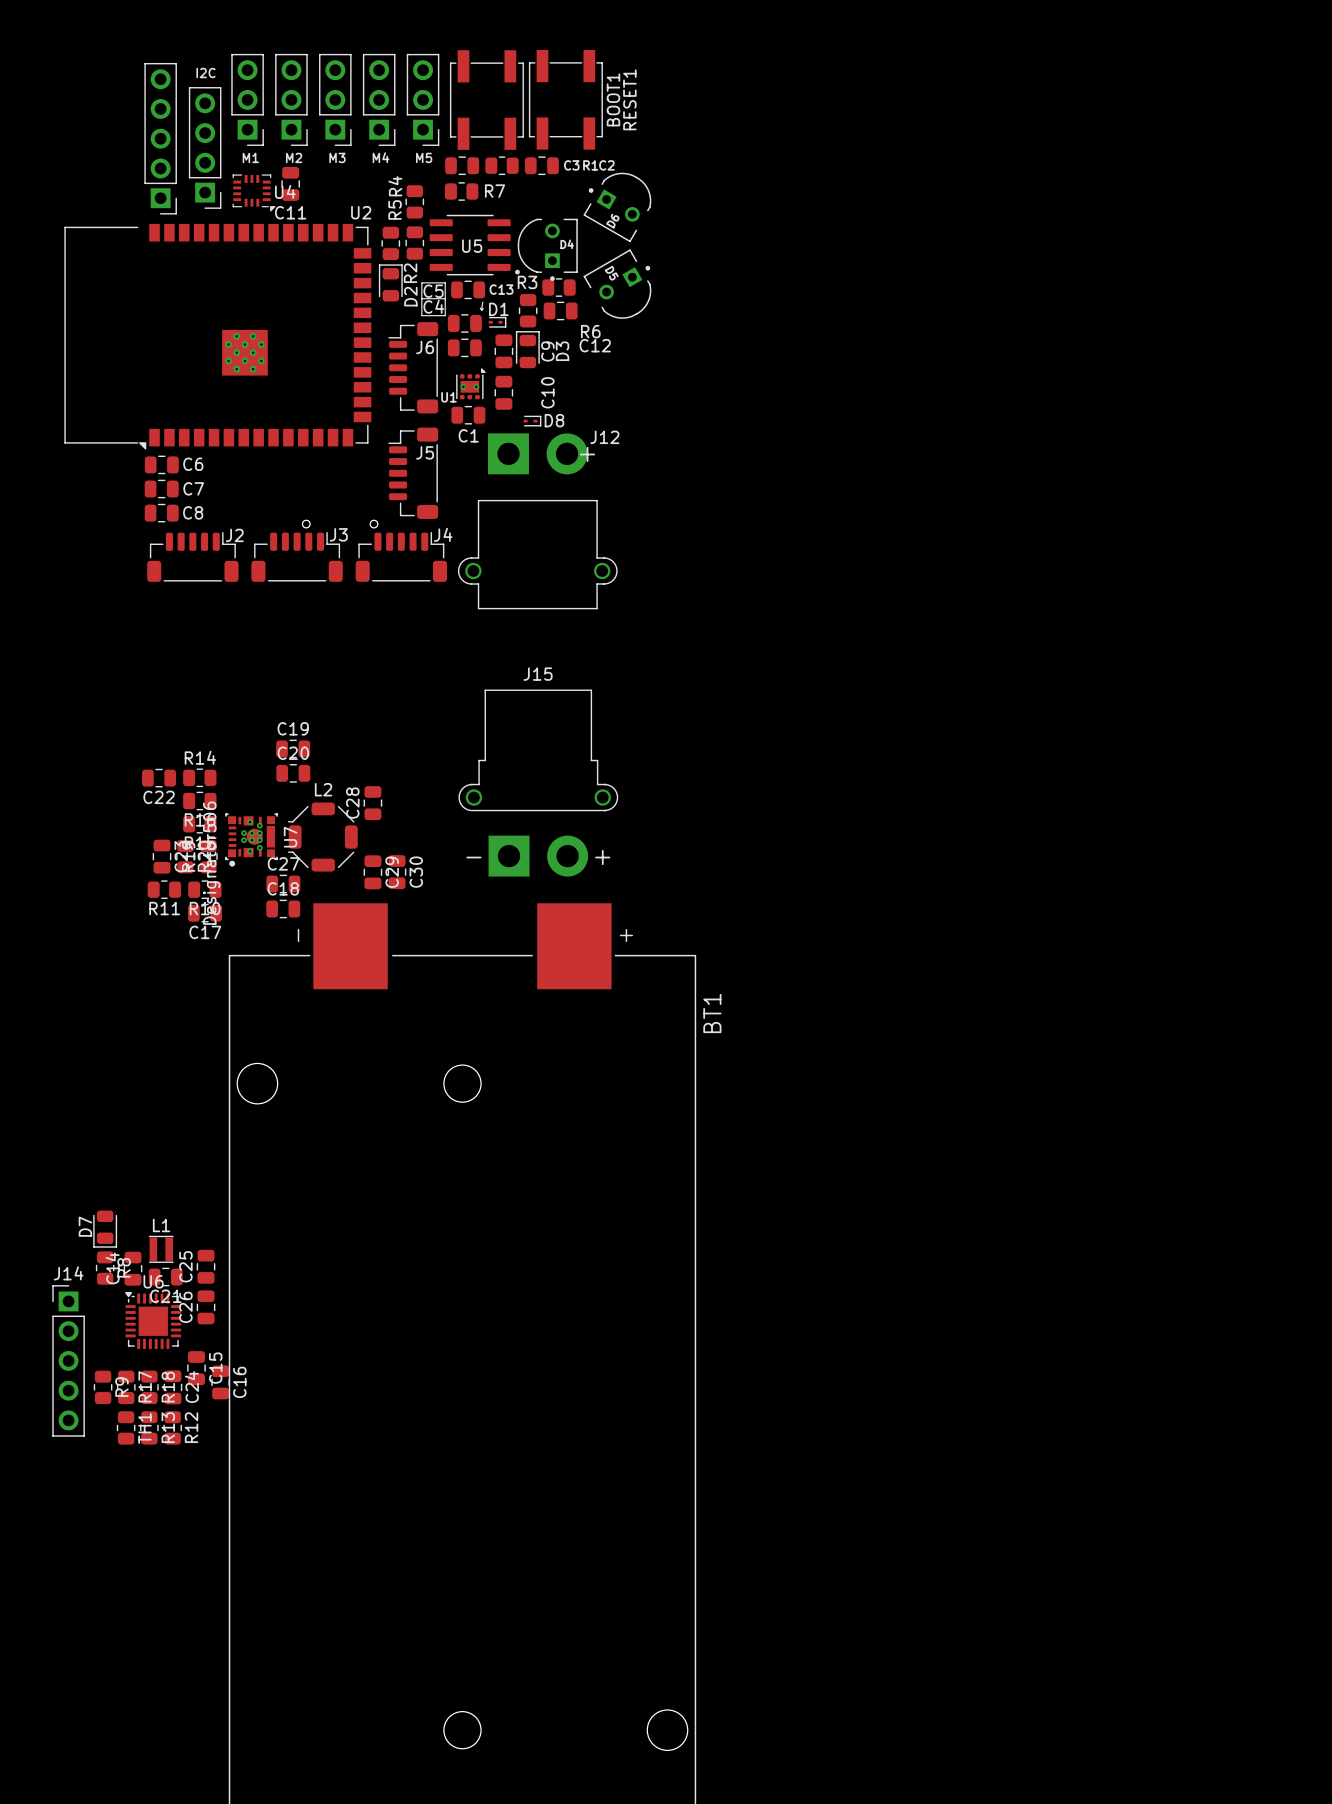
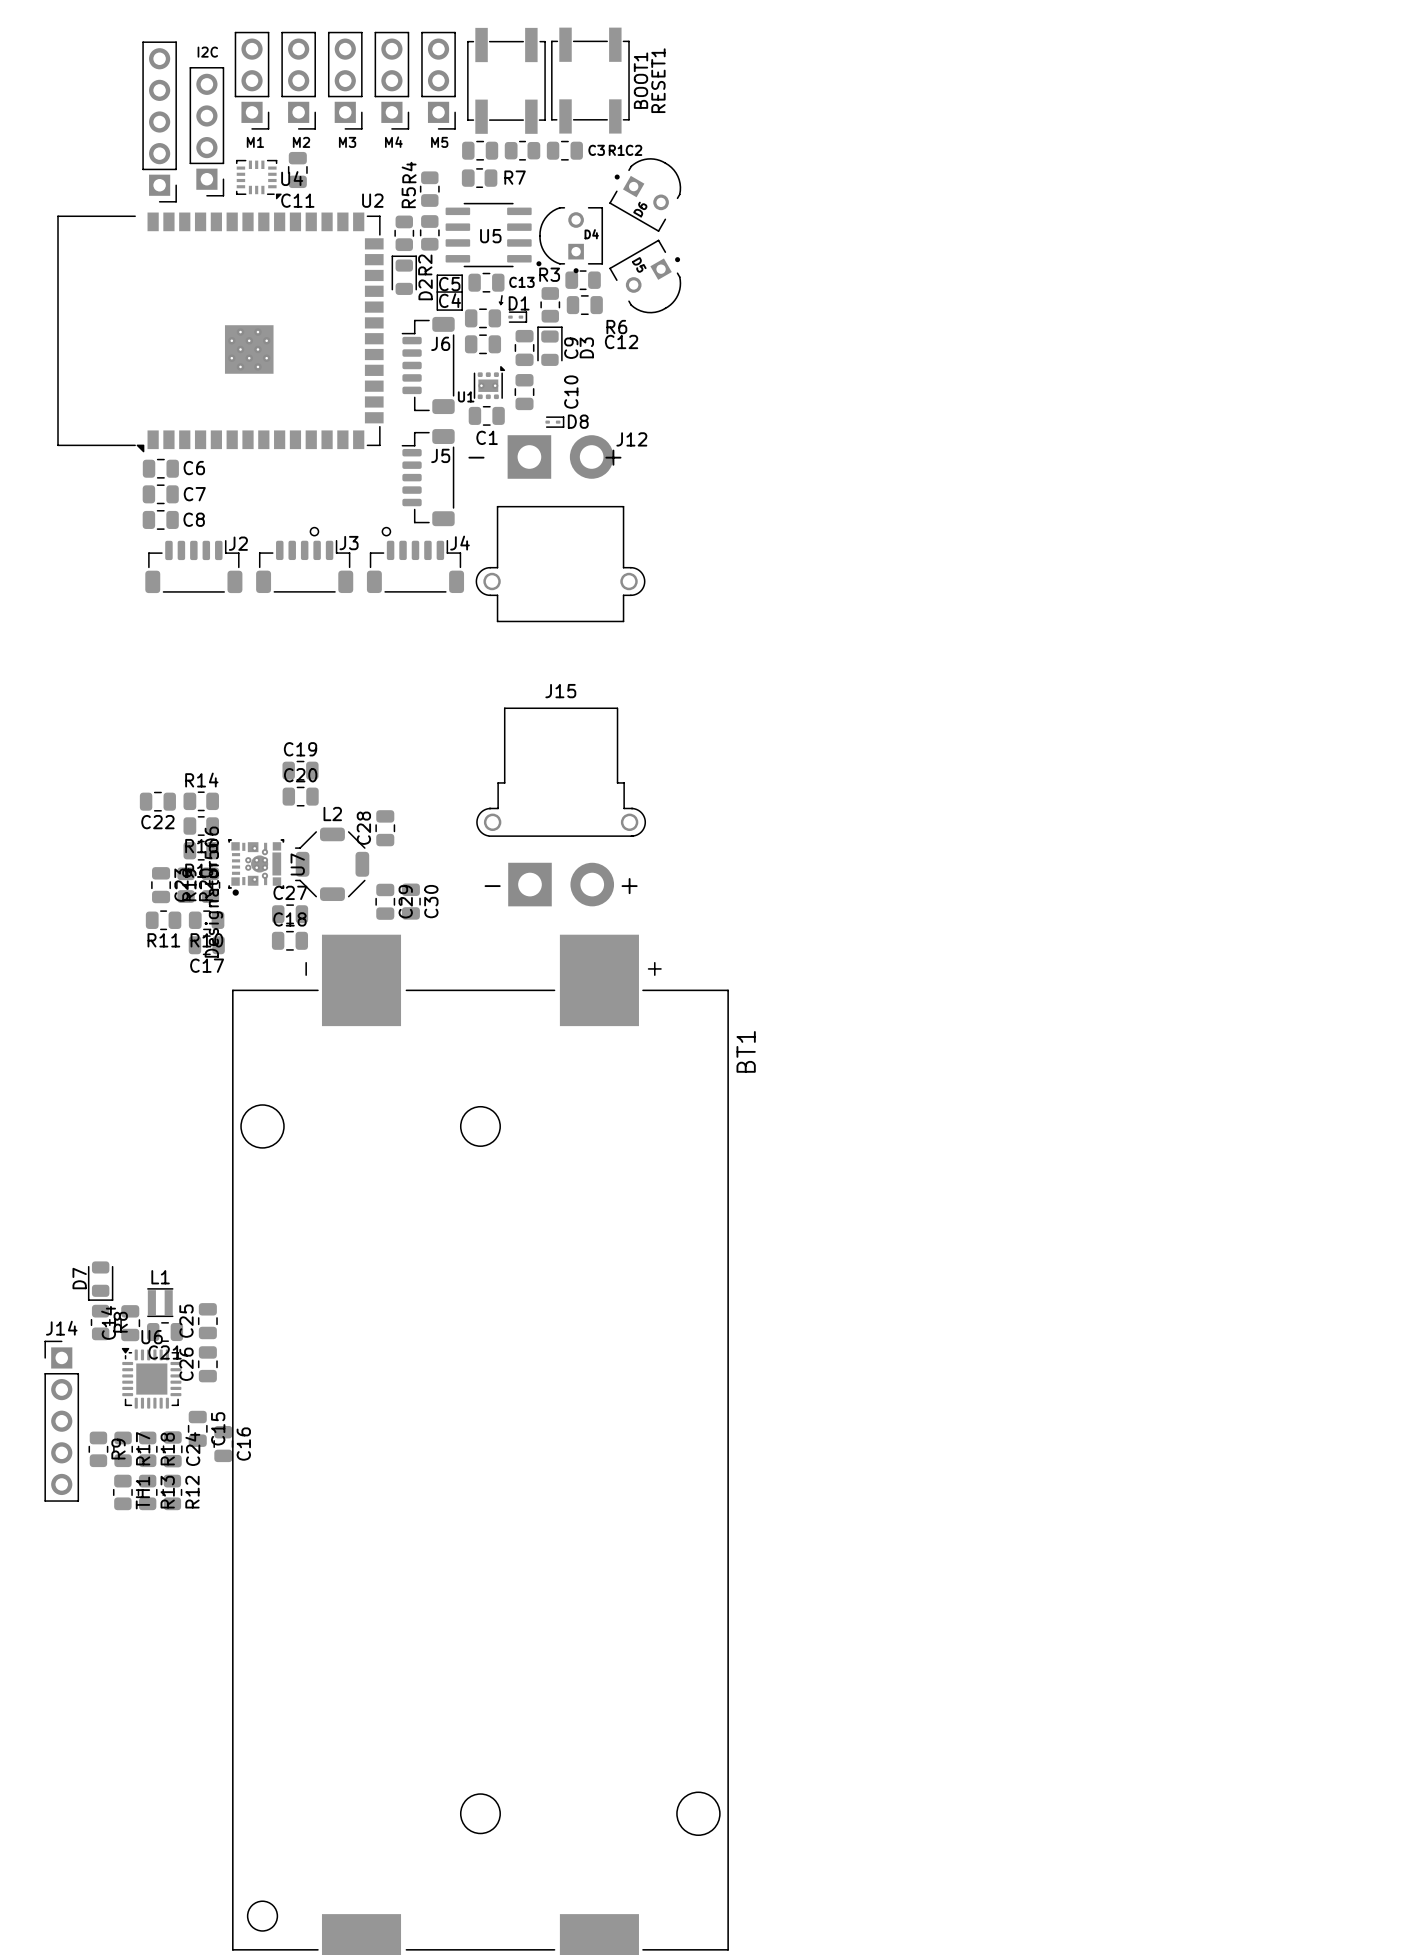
J12 text: none -> - (476, 457)

